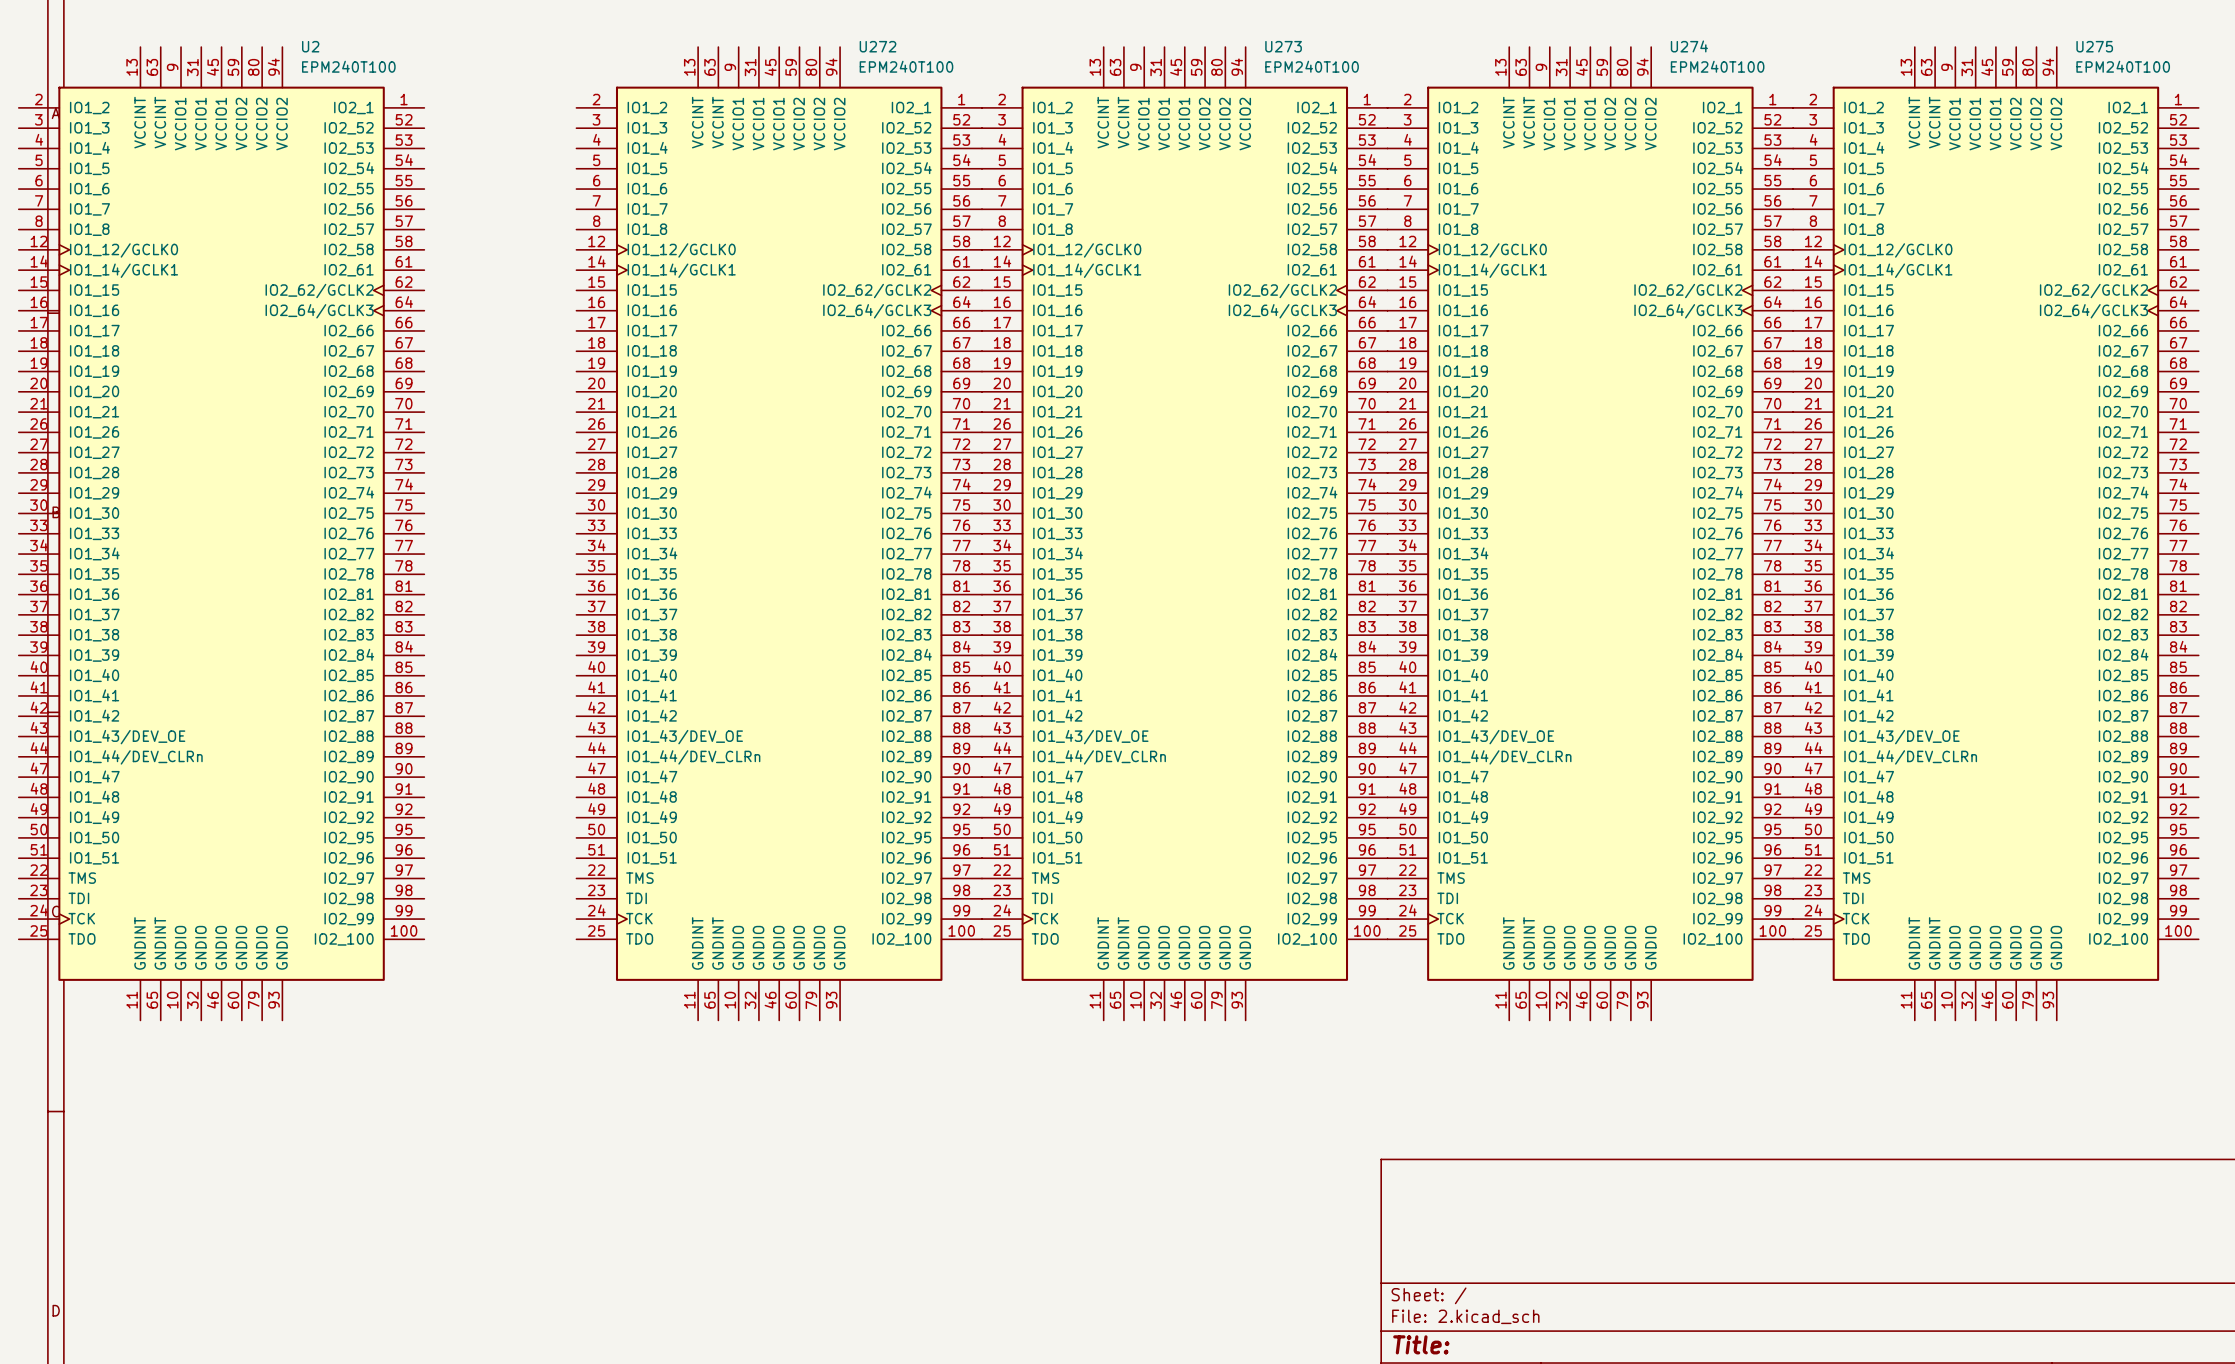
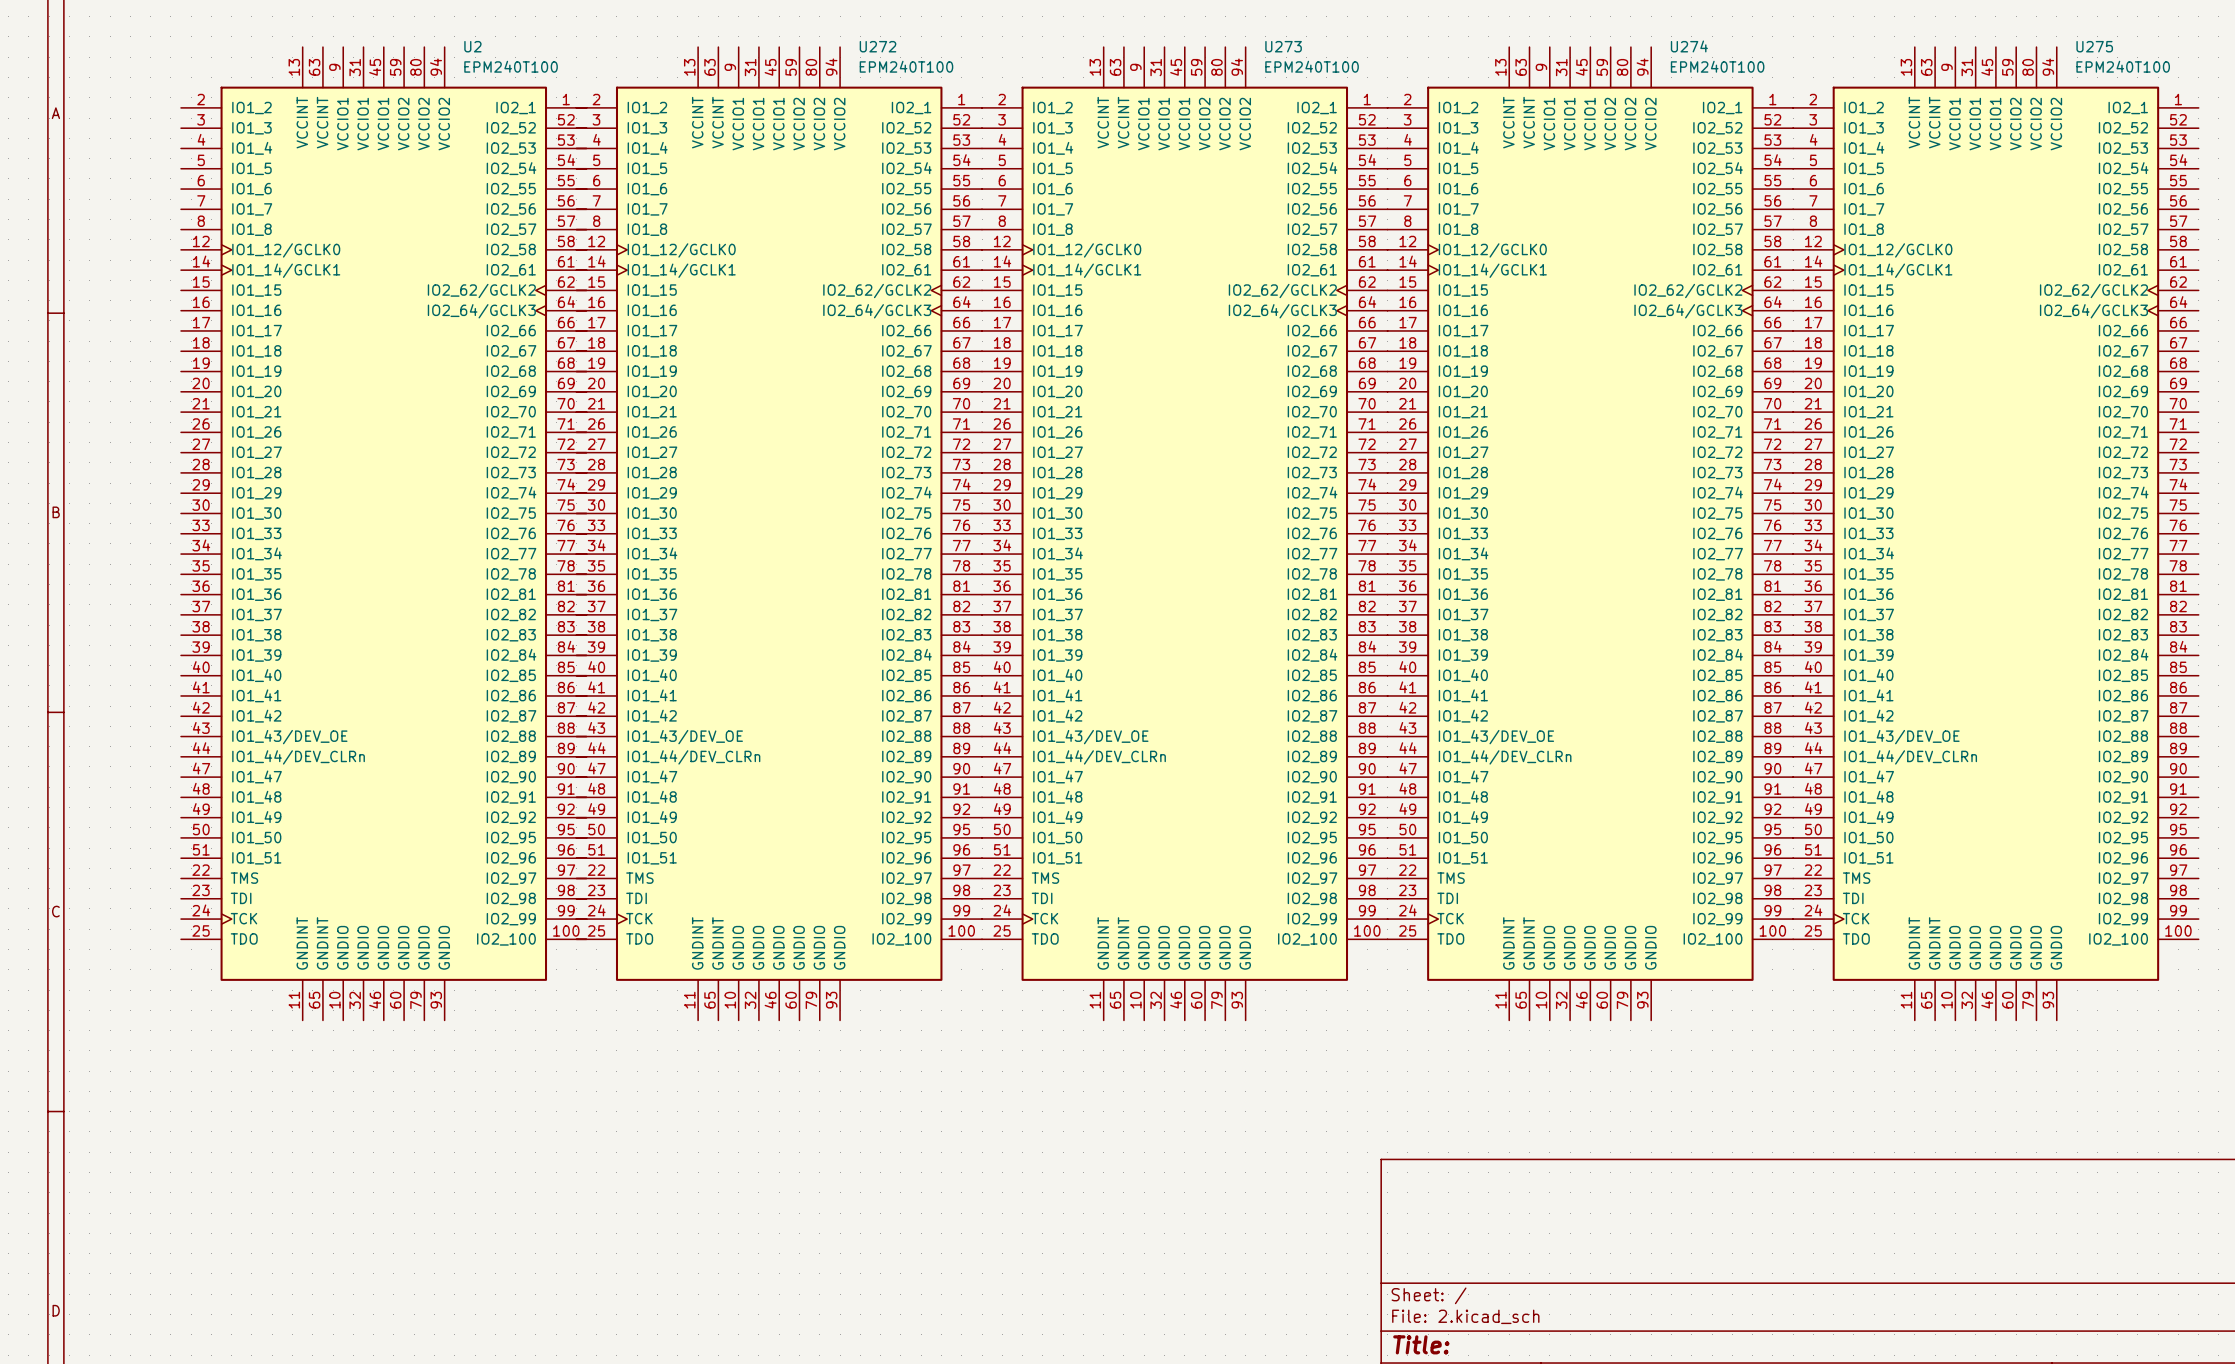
U2 position: (221, 533) -> (383, 533)

